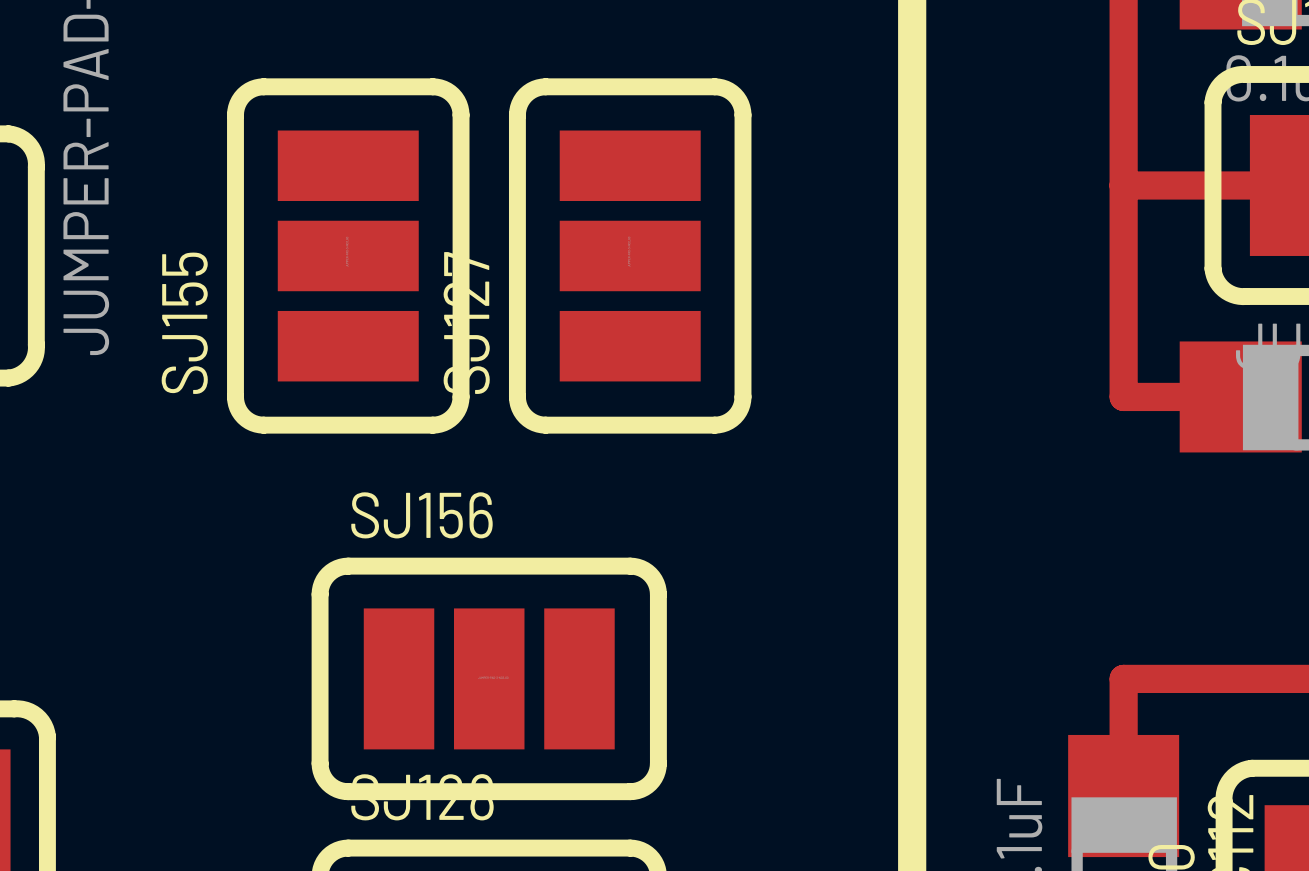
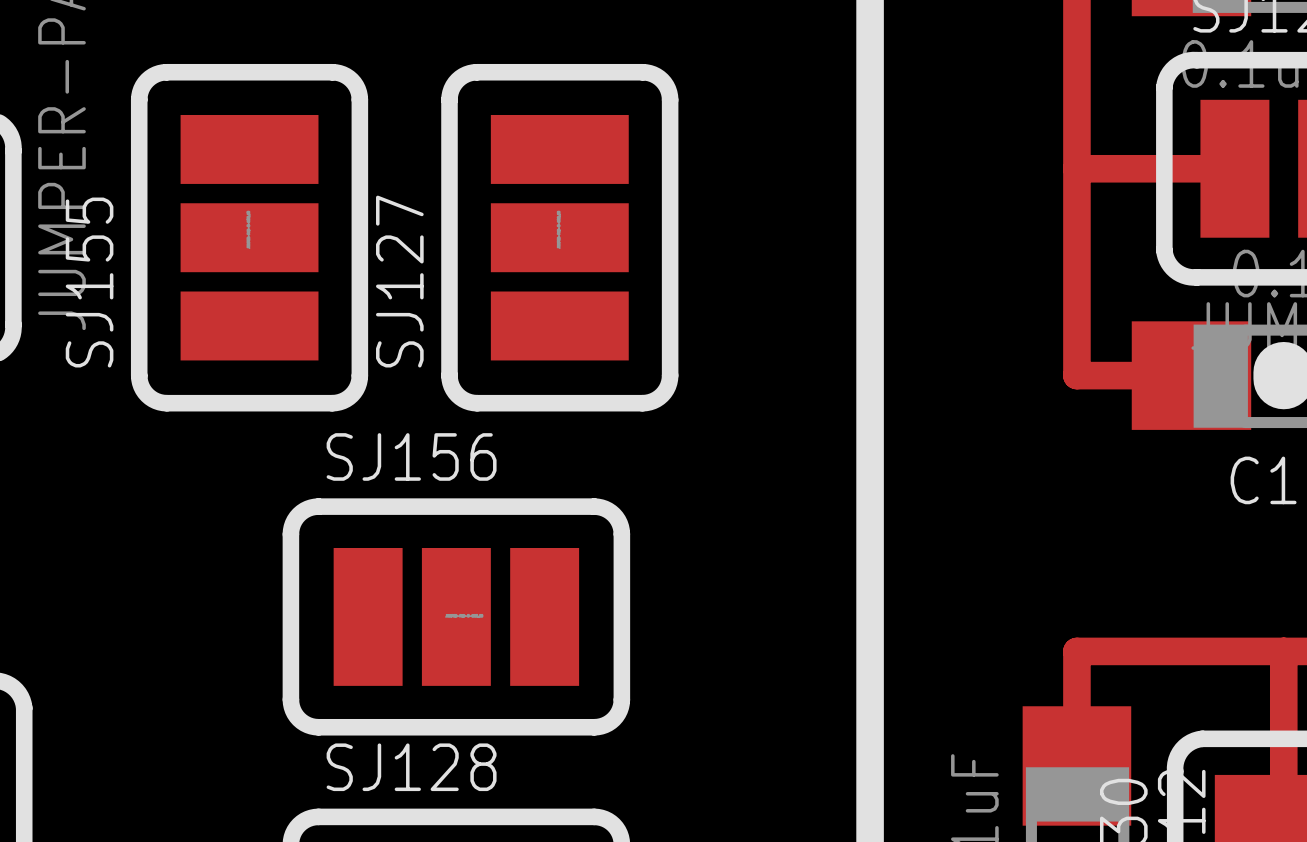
SJ155 position: (348, 255) -> (249, 237)
SJ127 position: (630, 255) -> (559, 237)
SJ156 position: (489, 678) -> (456, 616)

